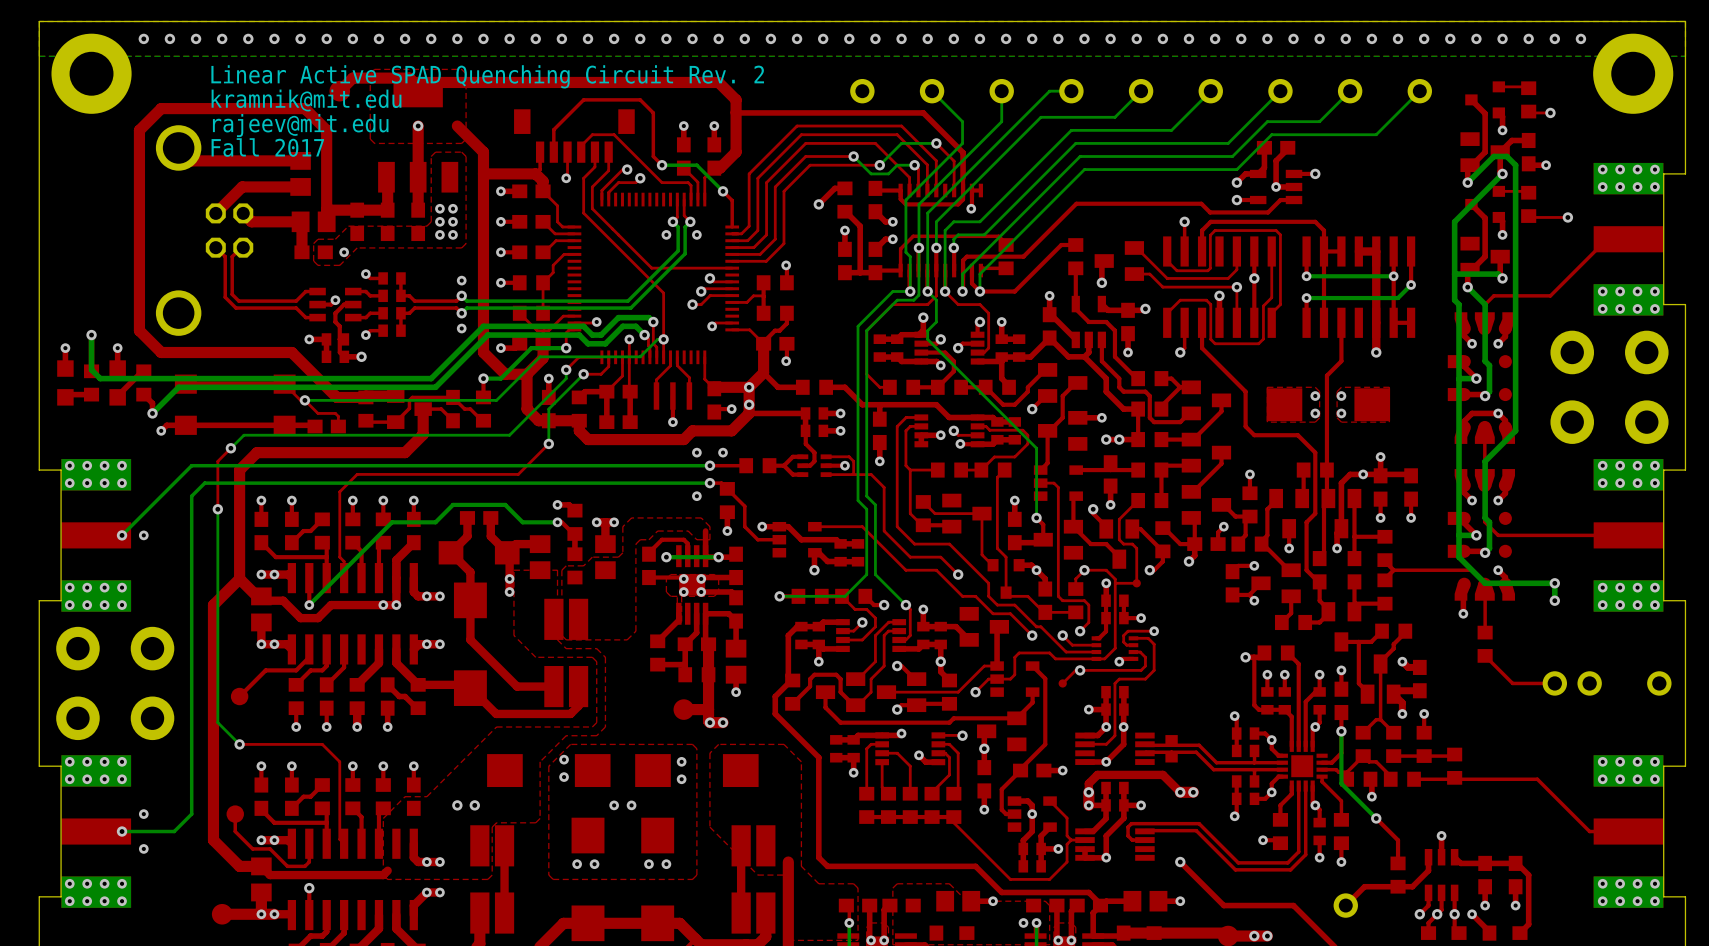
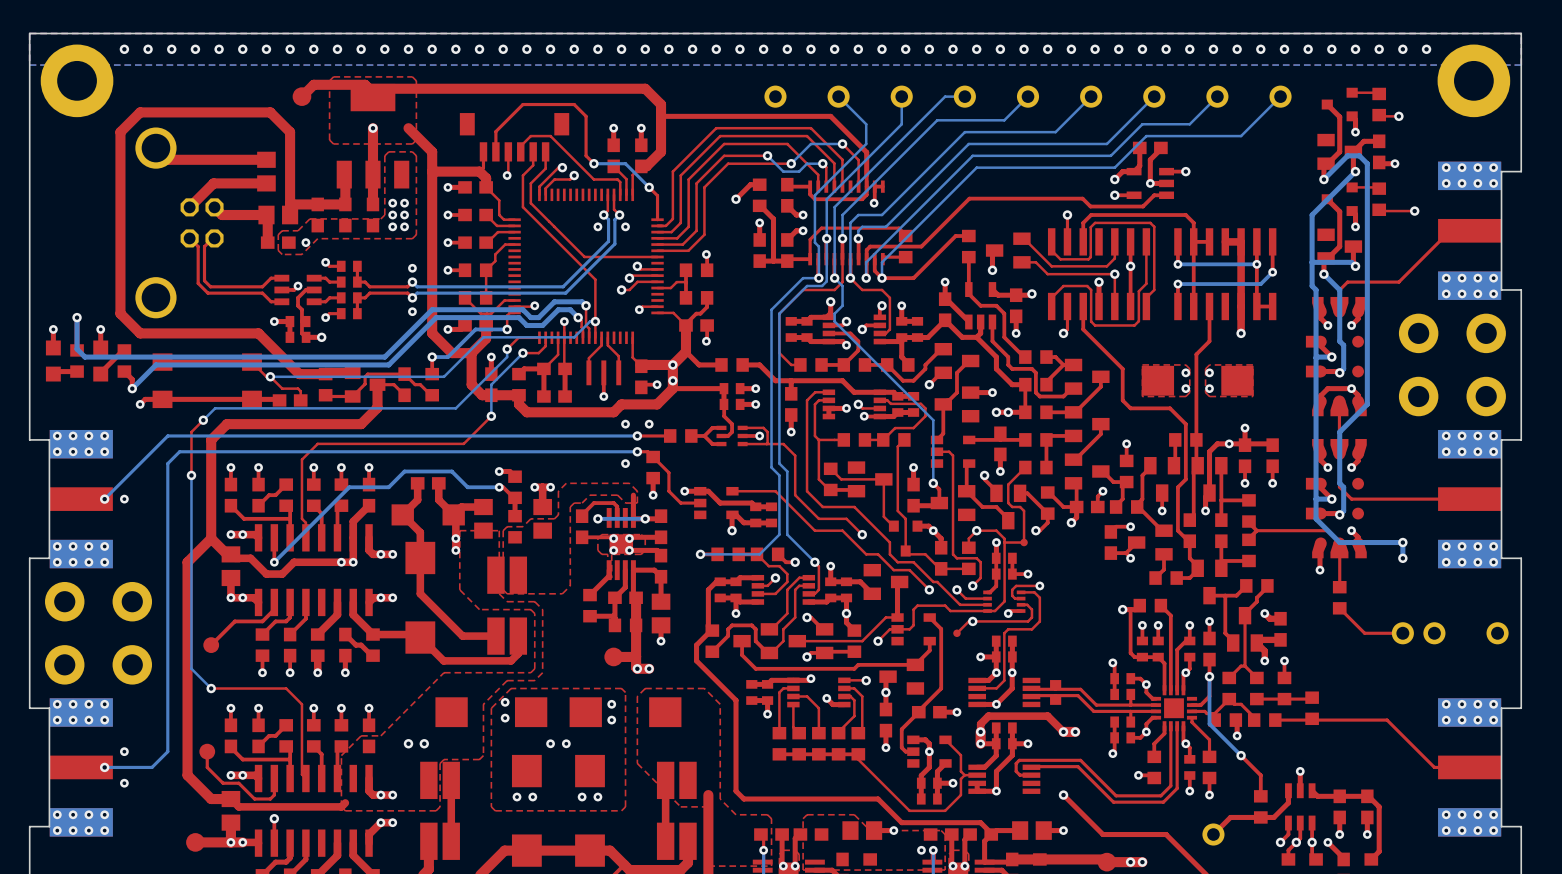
text: Linear Active SPAD Quenching Circuit Rev. 2 (487, 76) -> none
text: kramnik@mit.edu (306, 100) -> none
text: rajeev@mit.edu (300, 125) -> none
text: Fall 2017 (267, 147) -> none

